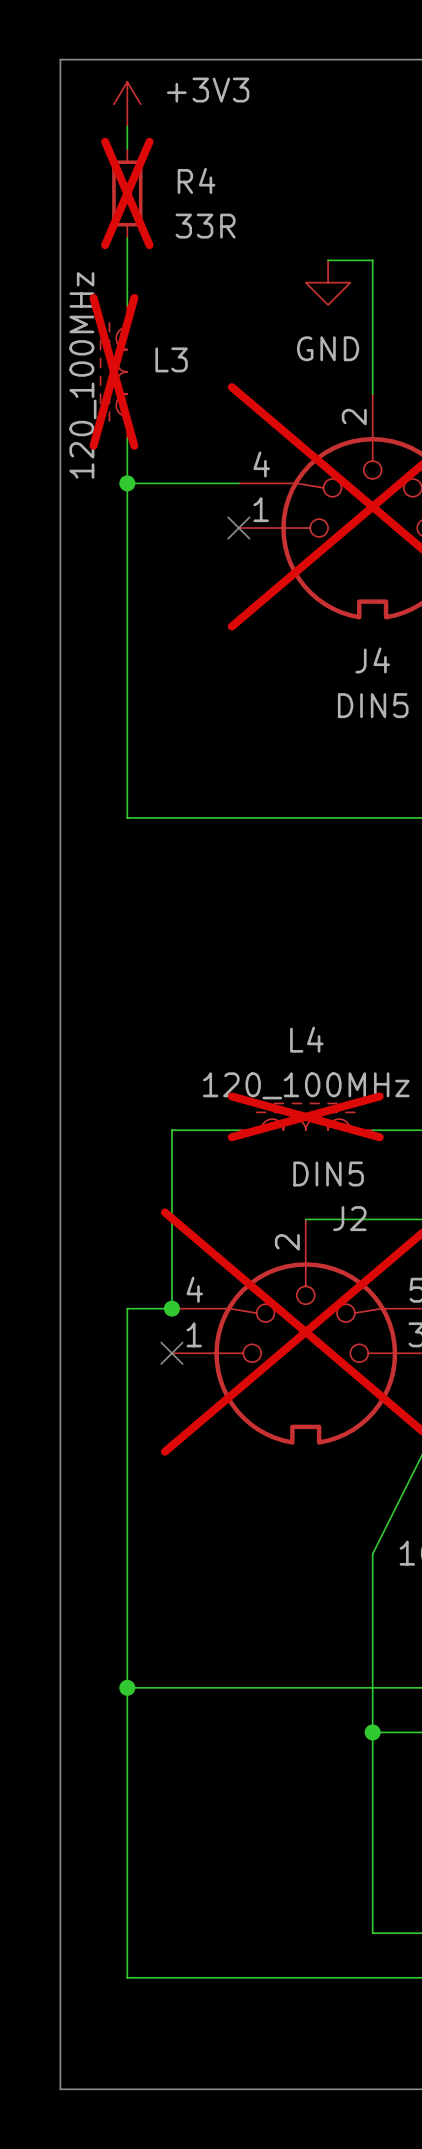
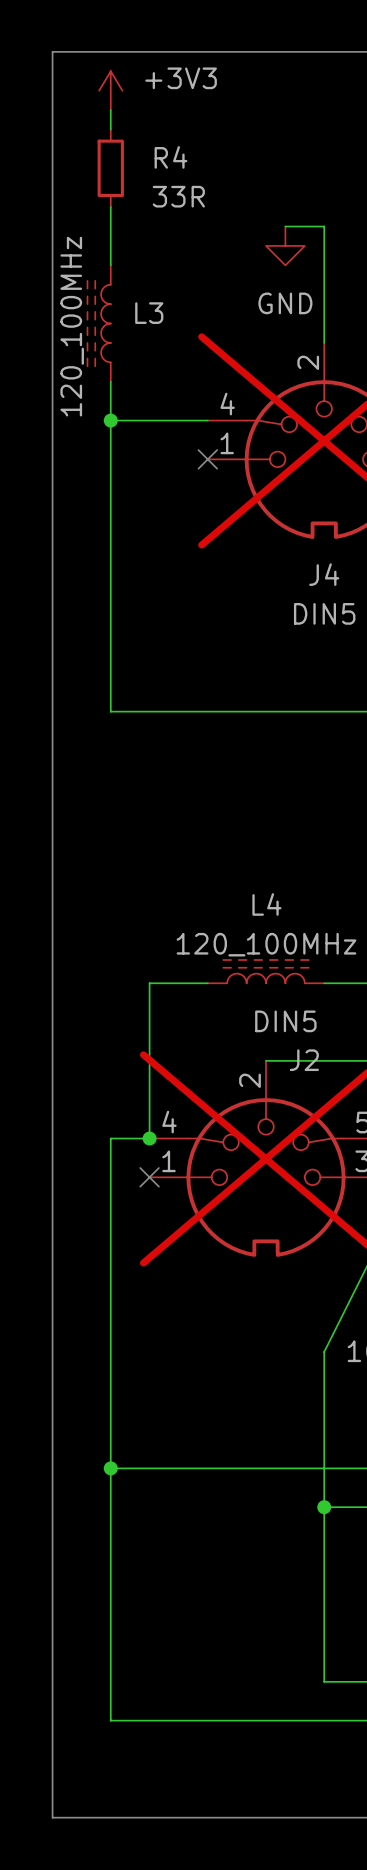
R4 do-not-place cross: (127, 193) -> none
L3 do-not-place cross: (113, 371) -> none
L4 do-not-place cross: (305, 1116) -> none

